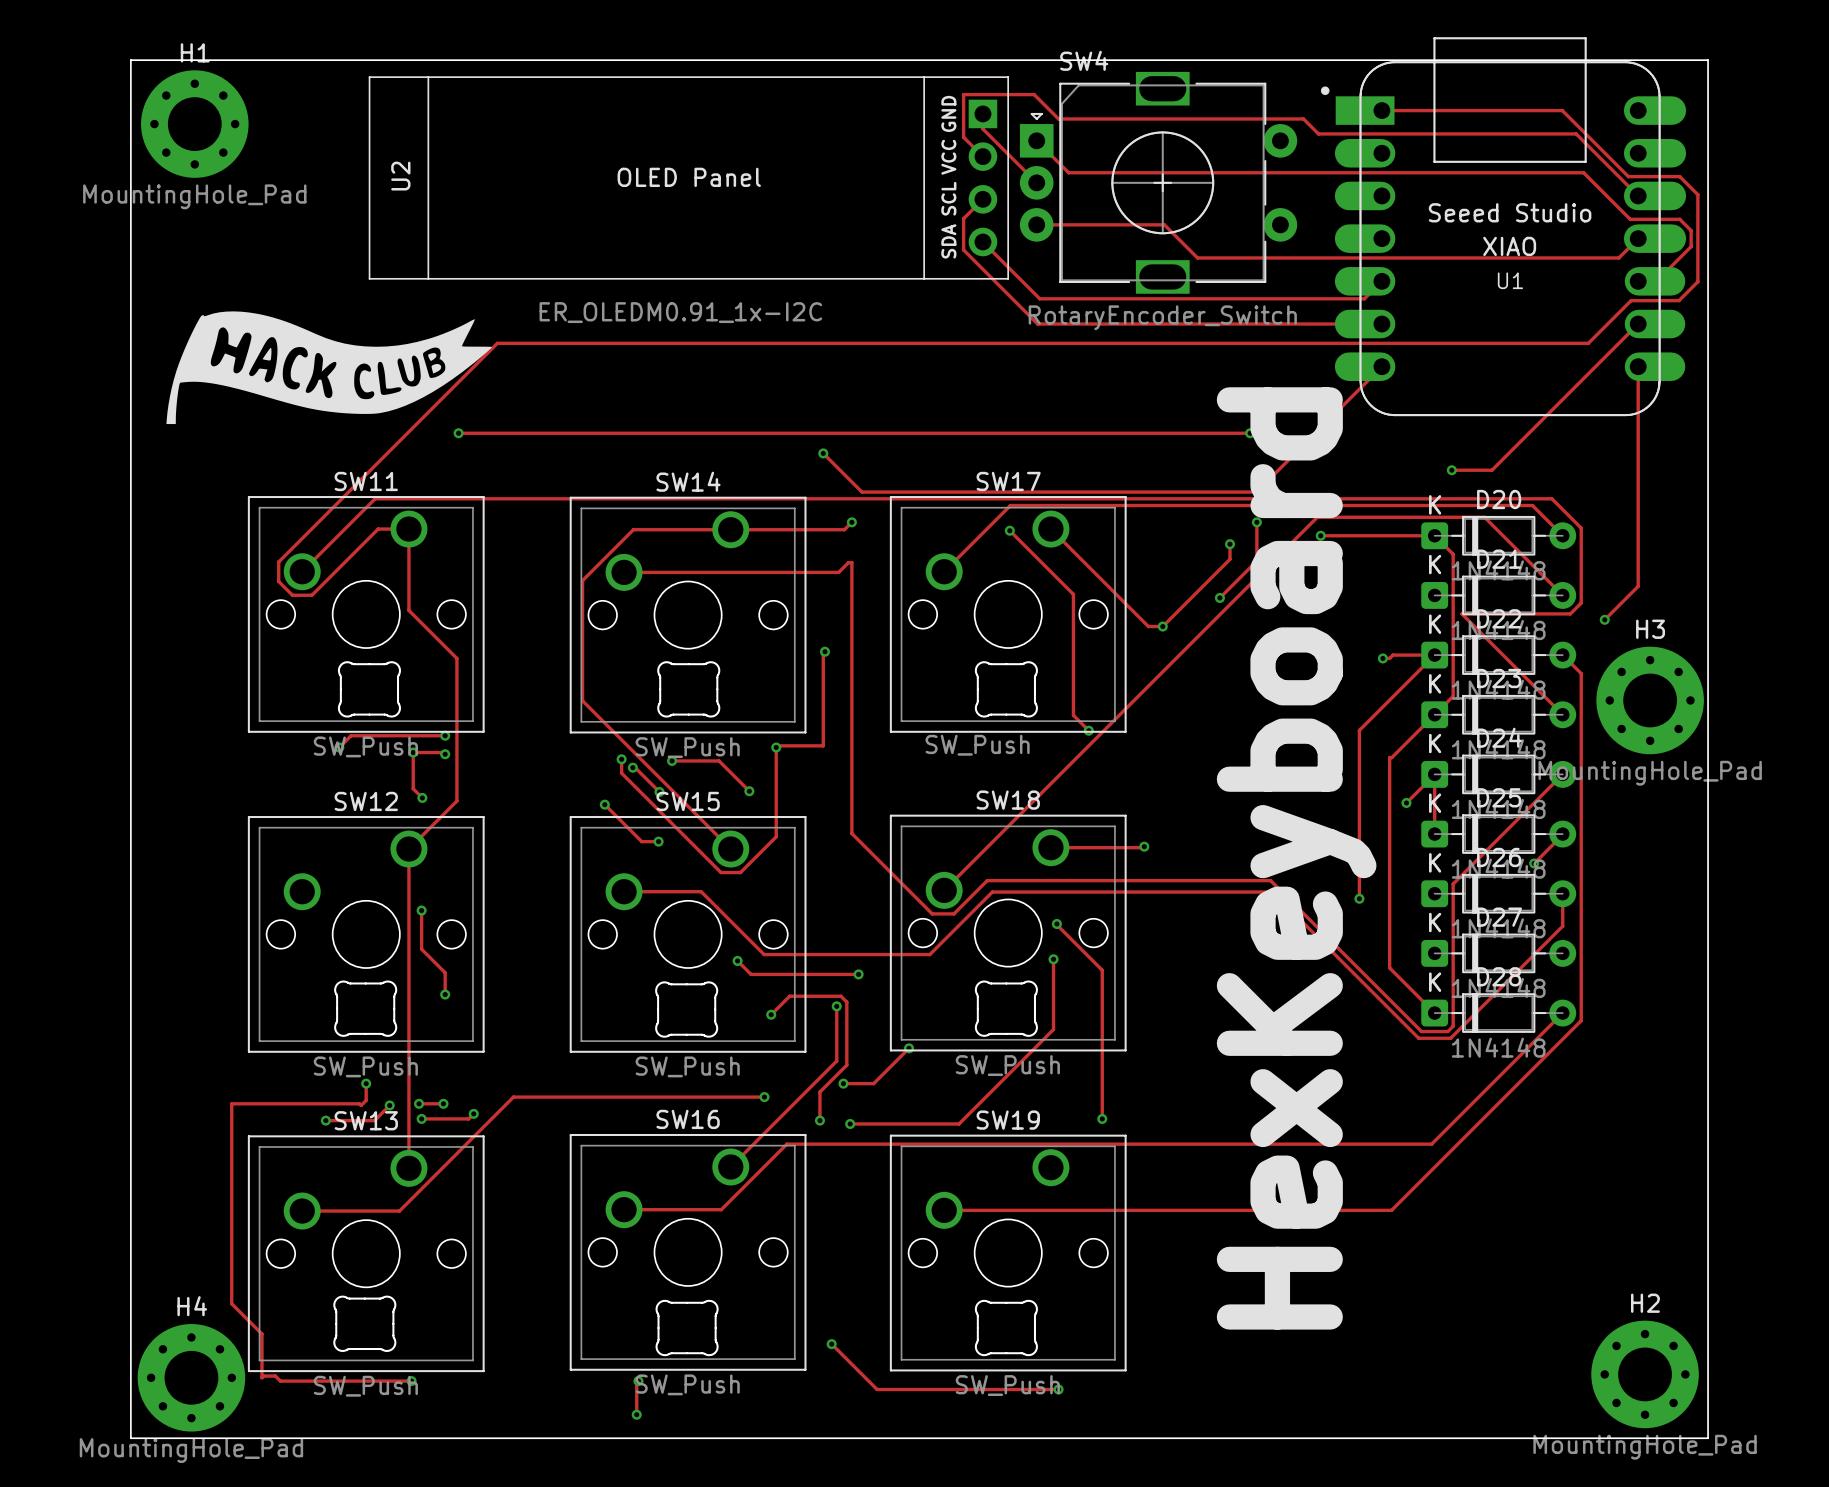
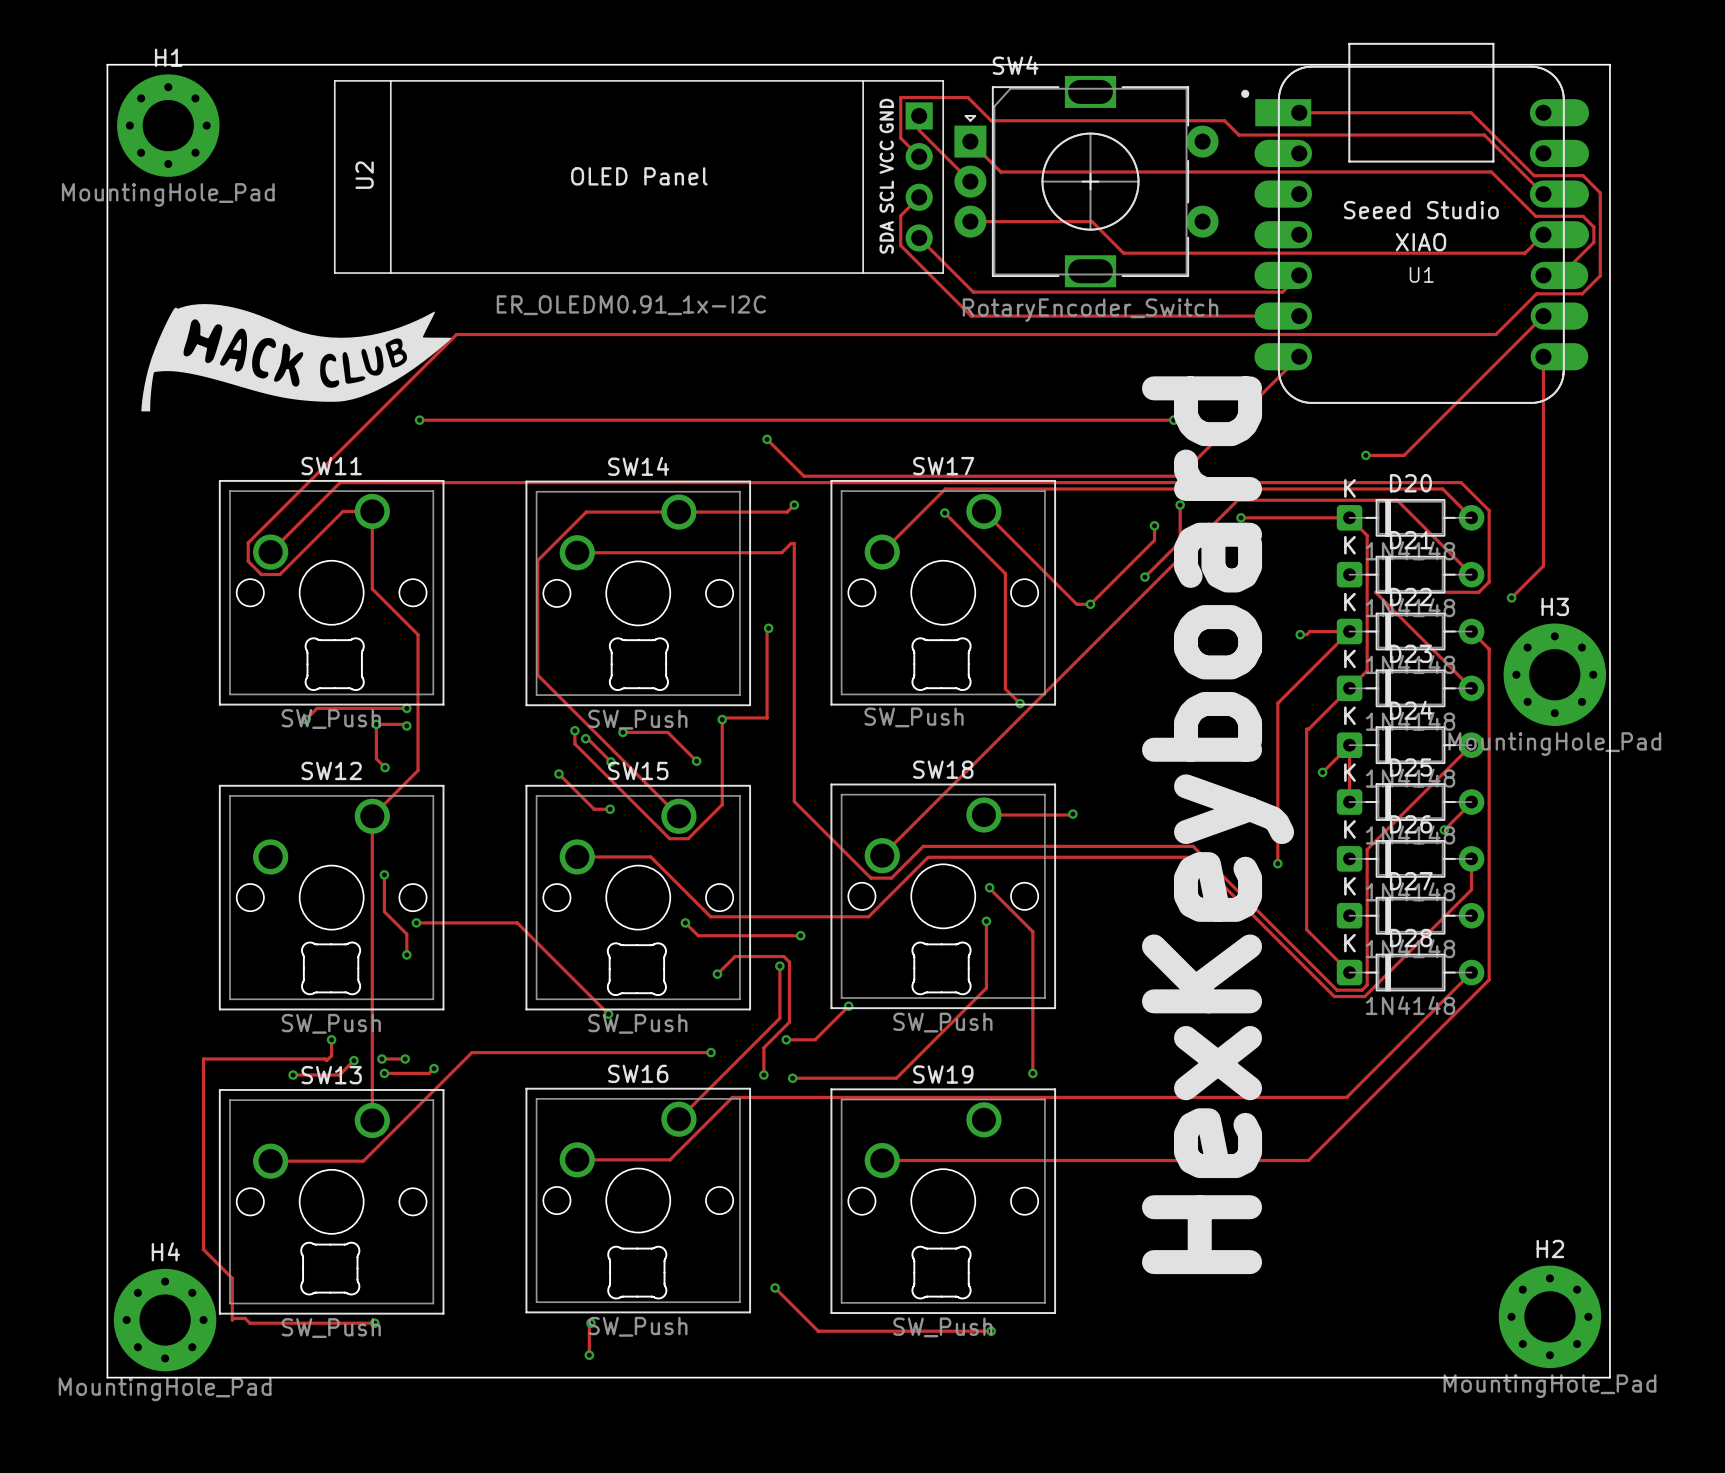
track: none -> (416, 922) (517, 922) (608, 1014)
via: none -> (416, 922)
via: none -> (608, 1014)

